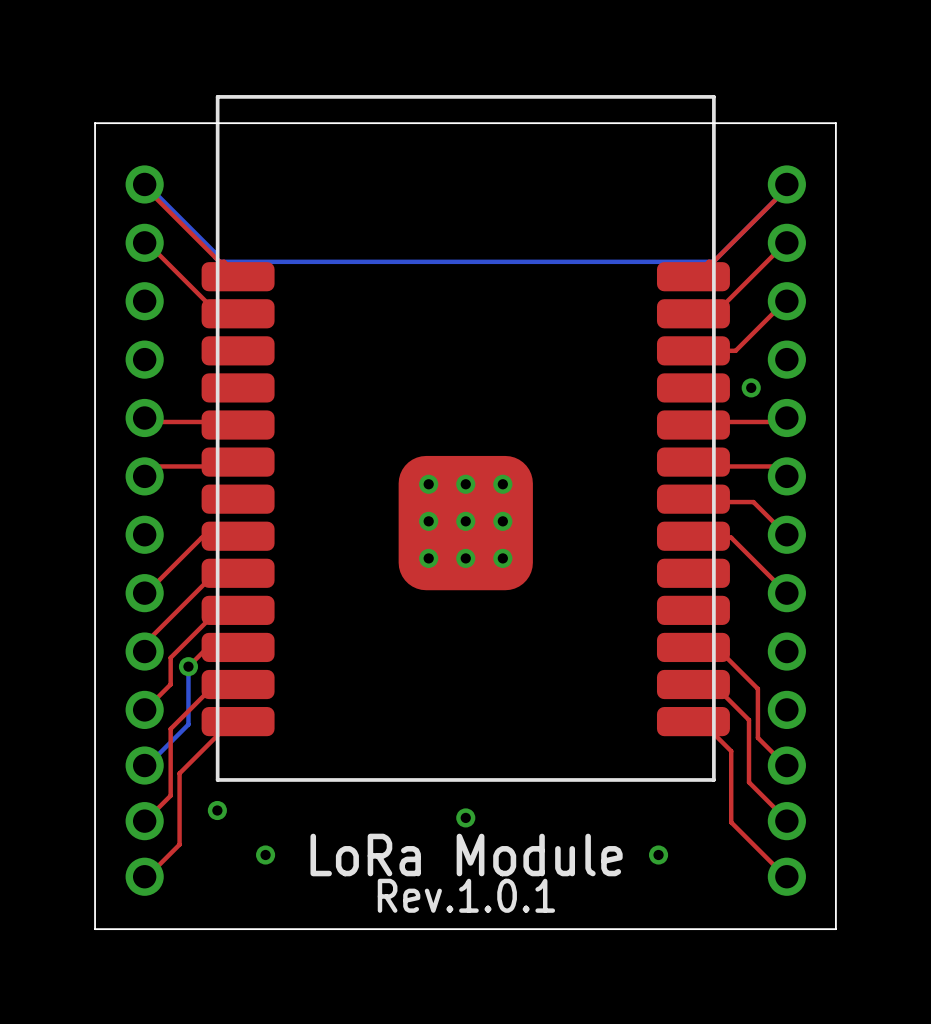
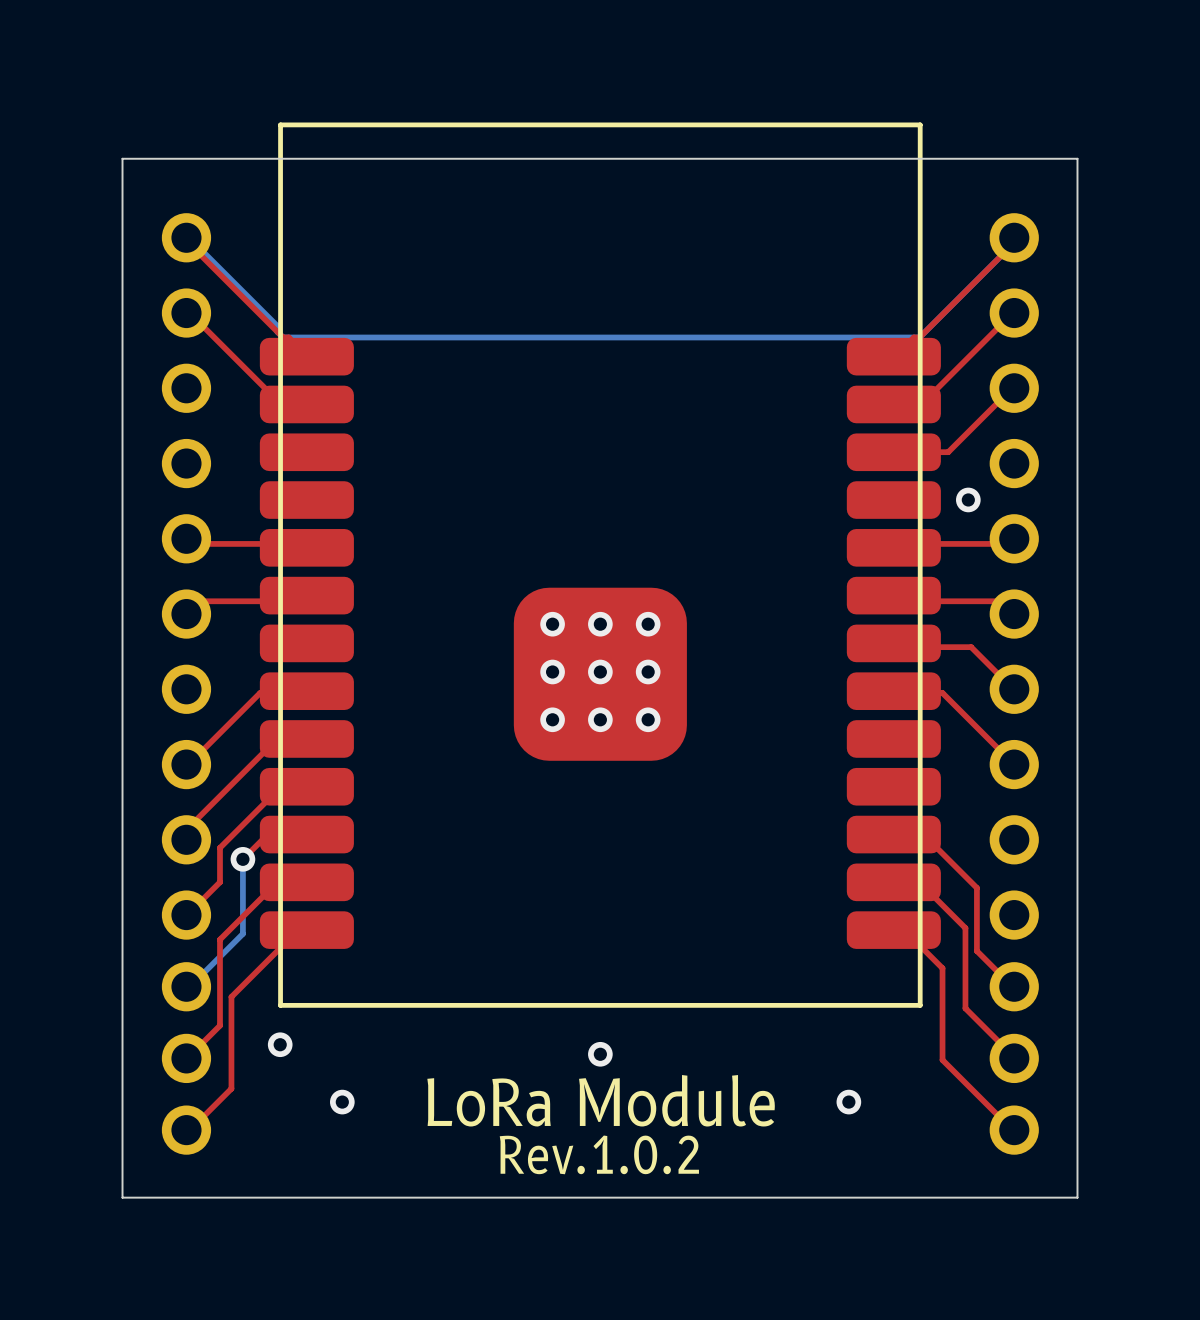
text: Rev.1.0.1 (466, 895) -> Rev.1.0.2 (599, 1154)

